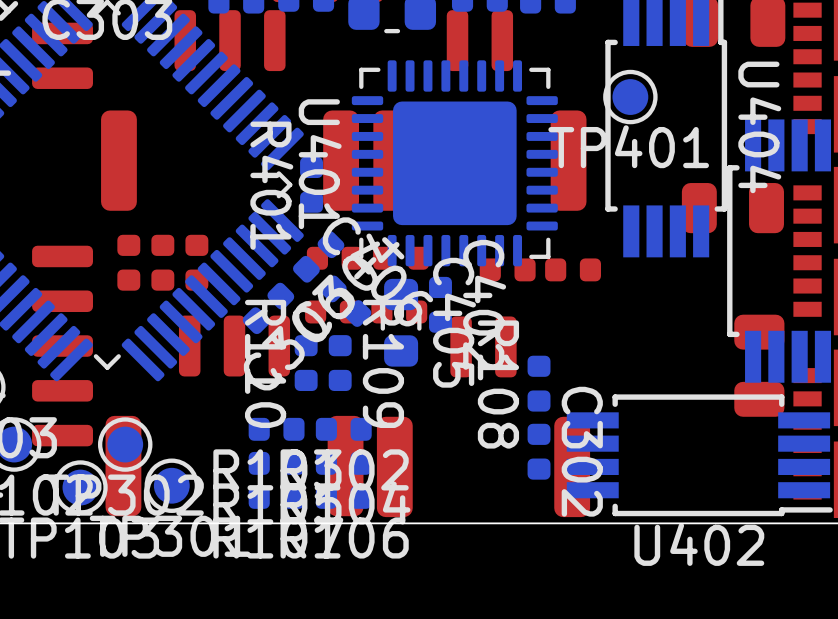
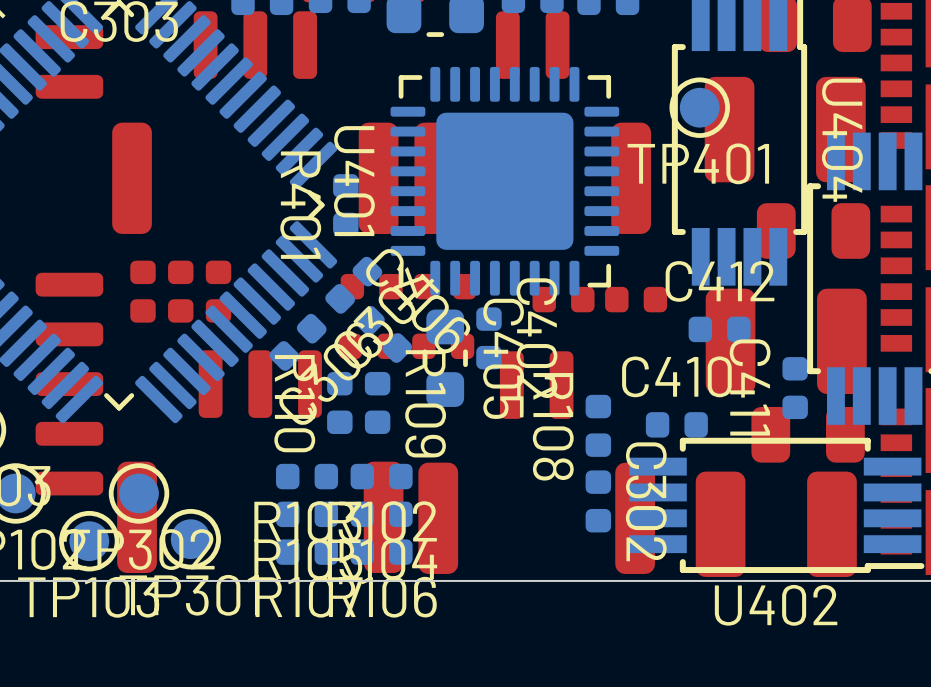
part: none -> (785, 129)
C412: none -> (719, 329)
part: none -> (786, 341)
C411: none -> (795, 388)
part rotation: 0° (759, 365) -> 90° clockwise (808, 434)
C410: none -> (676, 424)
part: none -> (776, 524)

